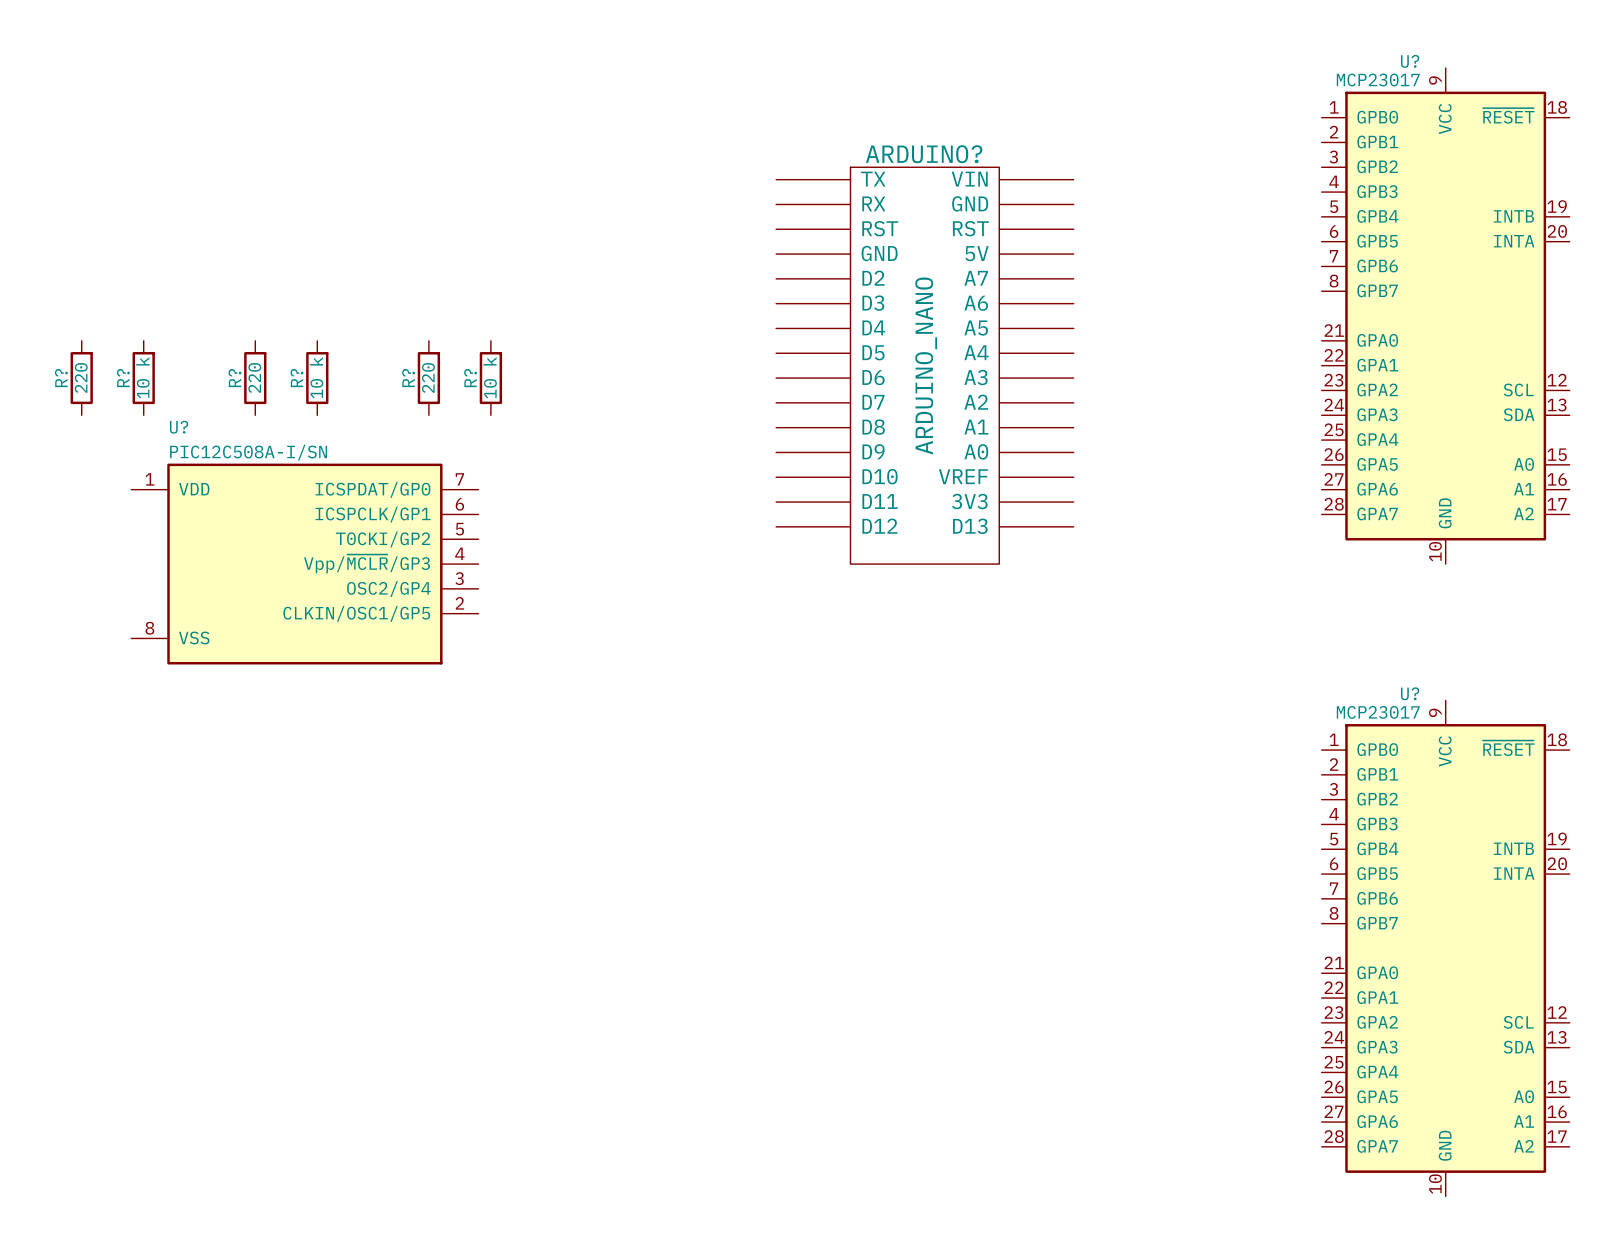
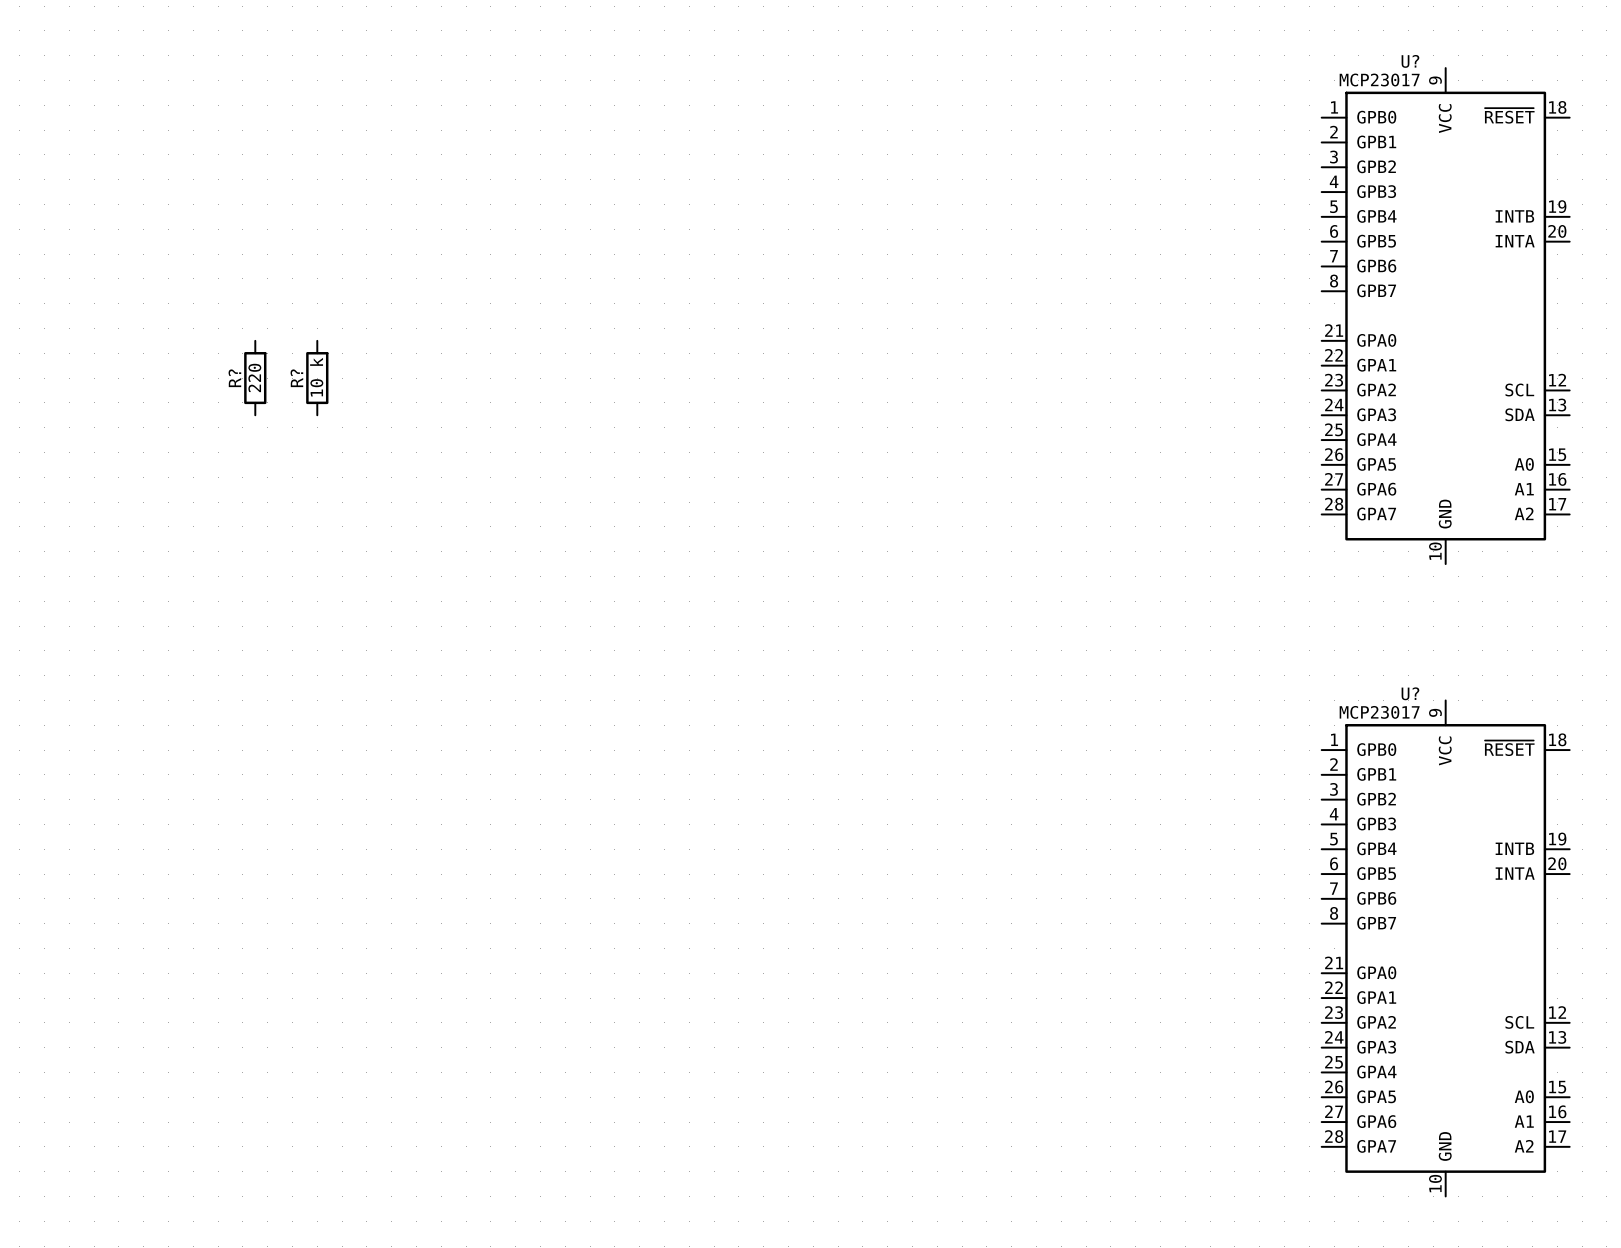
ARDUINO?: ARDUINO_NANO (924, 365) -> none
R?: 220 (81, 378) -> none
R?: 10 k (143, 378) -> none
R?: 220 (428, 378) -> none
R?: 10 k (490, 378) -> none
U?: PIC12C508A-I/SN (304, 564) -> none

